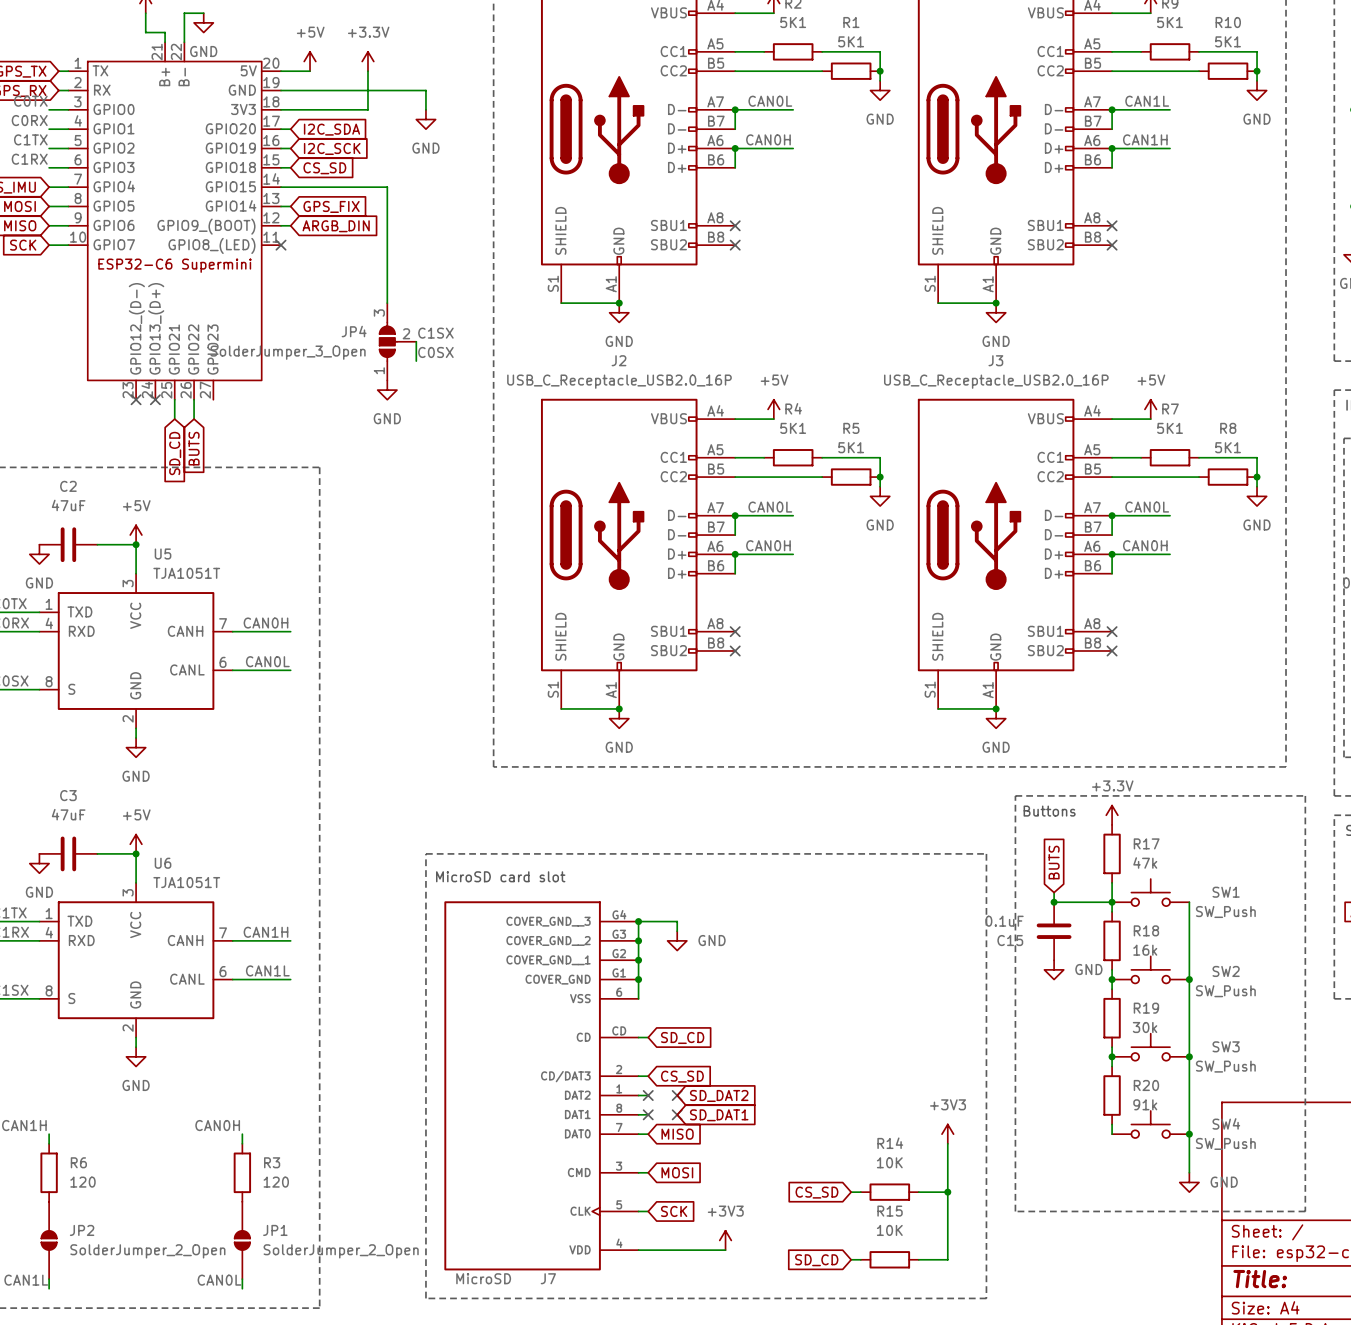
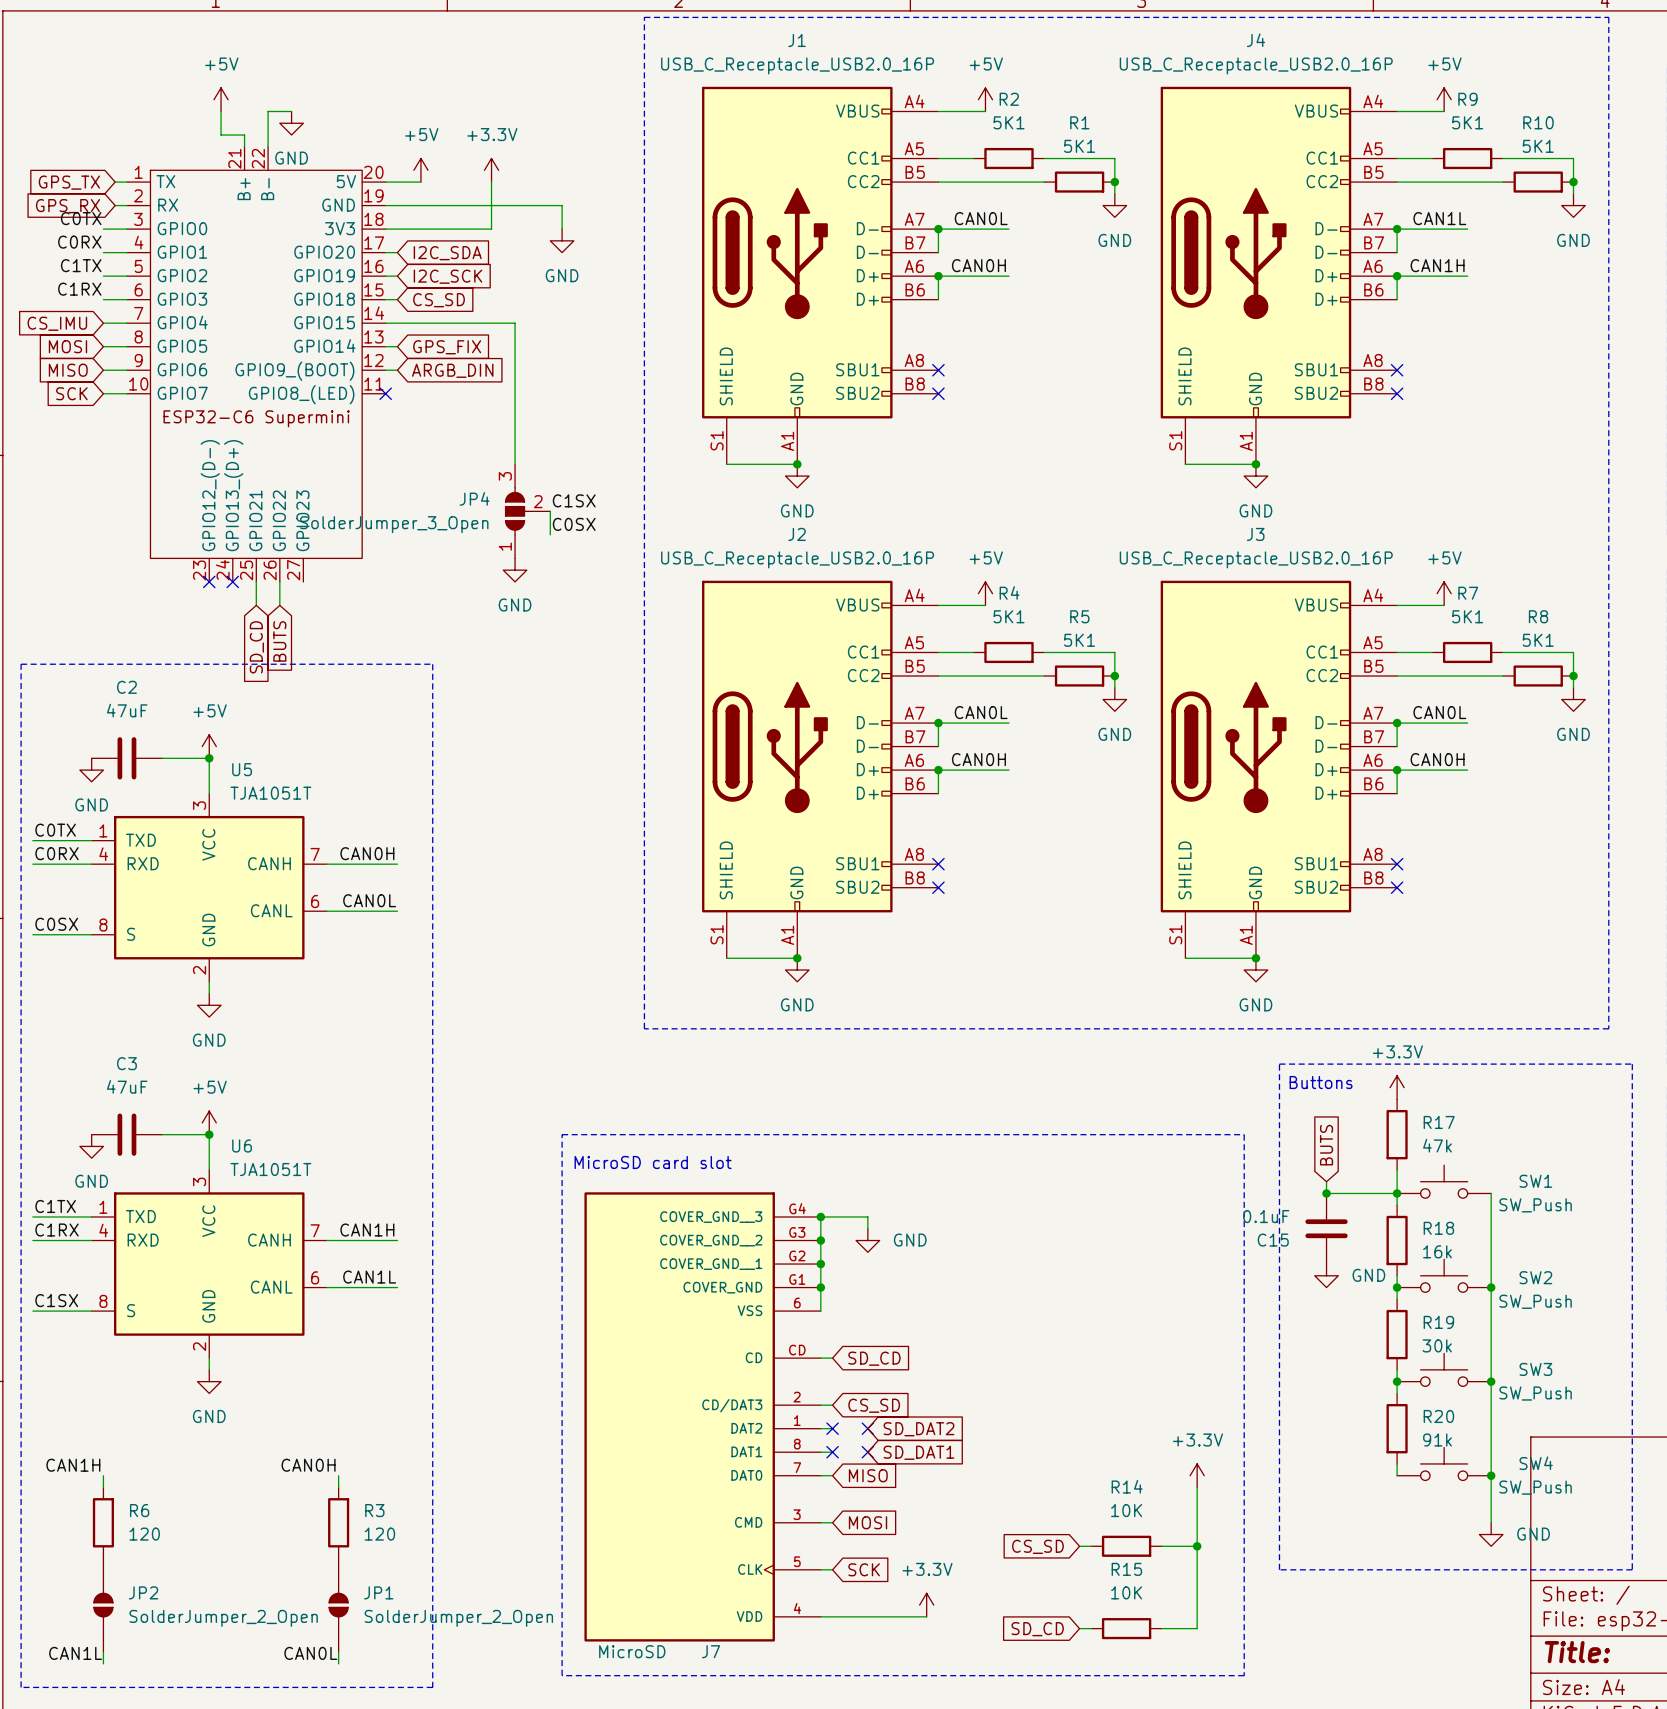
power symbol: +3V3 (947, 1134) -> +3.3V (1197, 1475)
power symbol: +3V3 (725, 1240) -> +3.3V (926, 1605)

